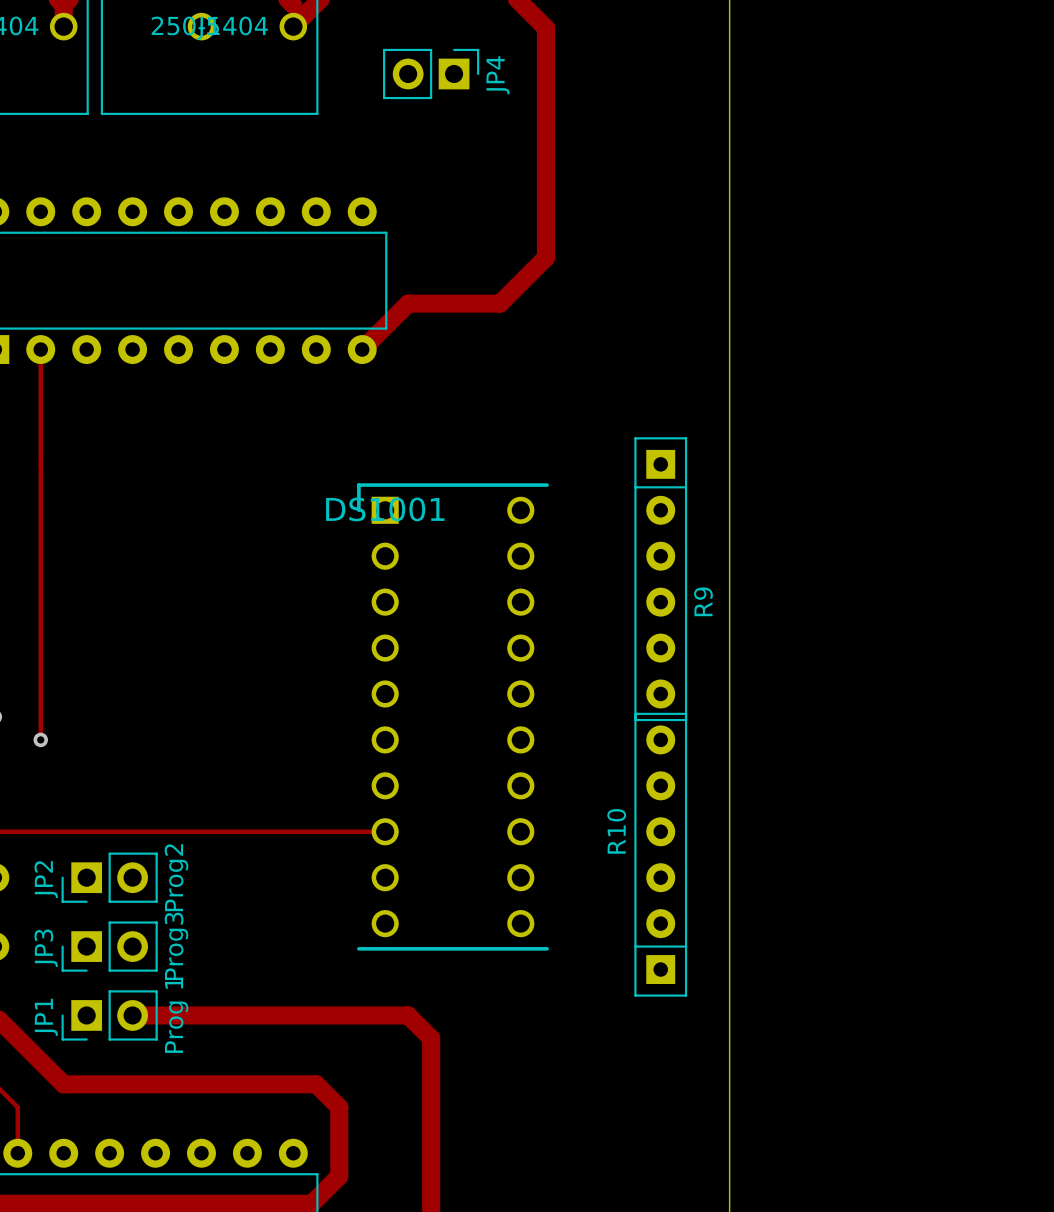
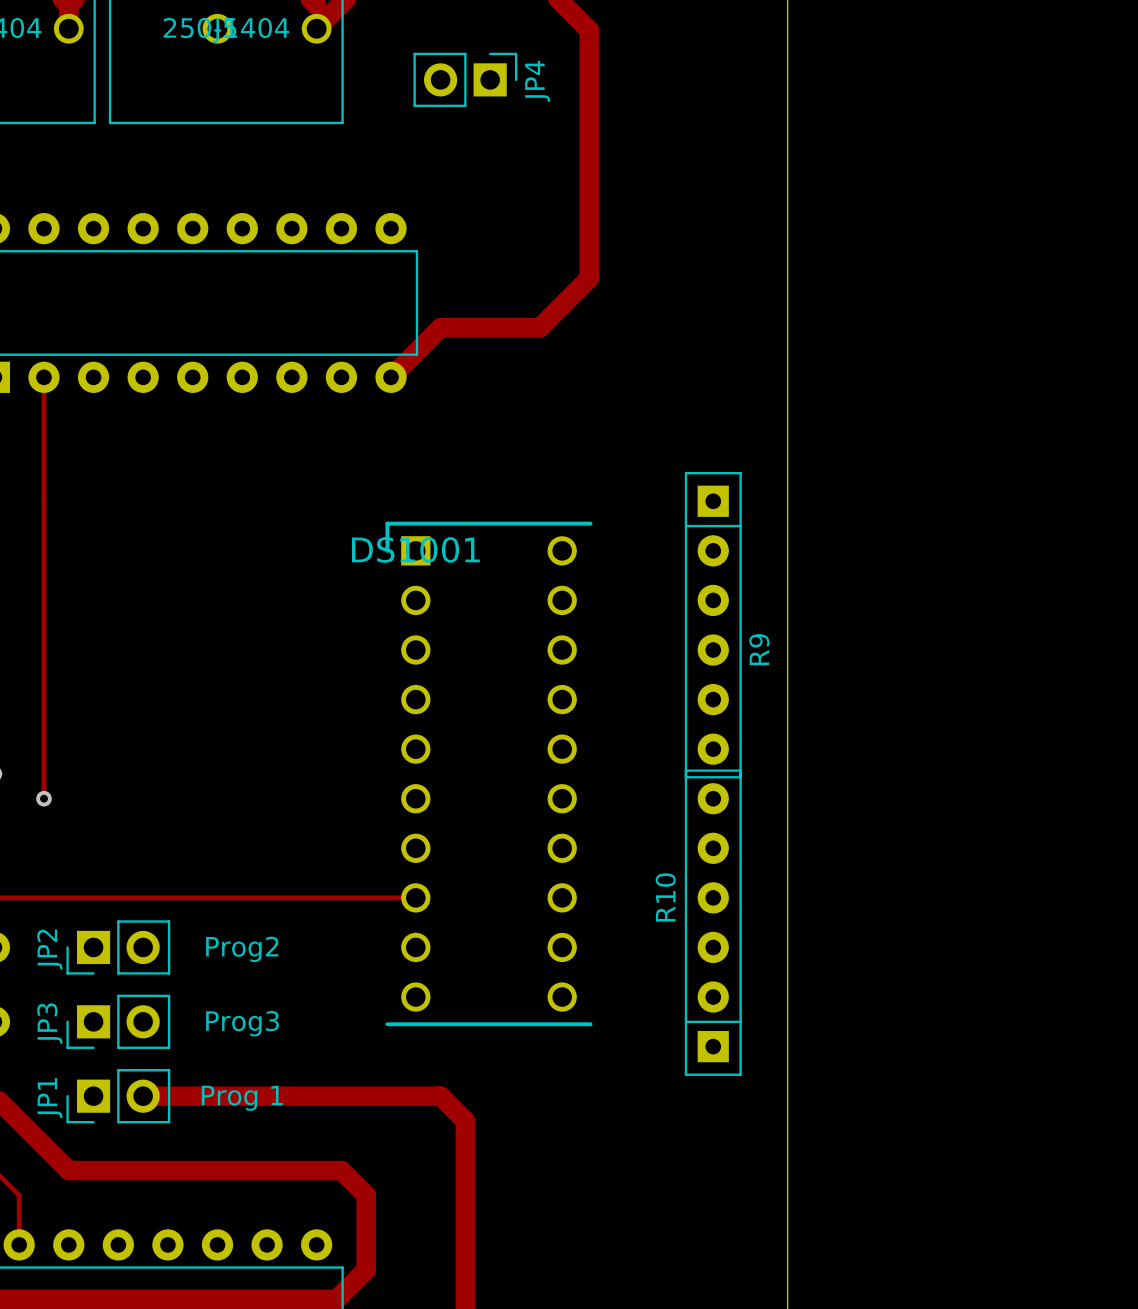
JP2 value rotation: 0° (176, 877) -> 90° clockwise (242, 949)
JP3 value rotation: 0° (176, 946) -> 90° clockwise (242, 1023)
JP1 value rotation: 0° (176, 1015) -> 90° clockwise (242, 1098)

